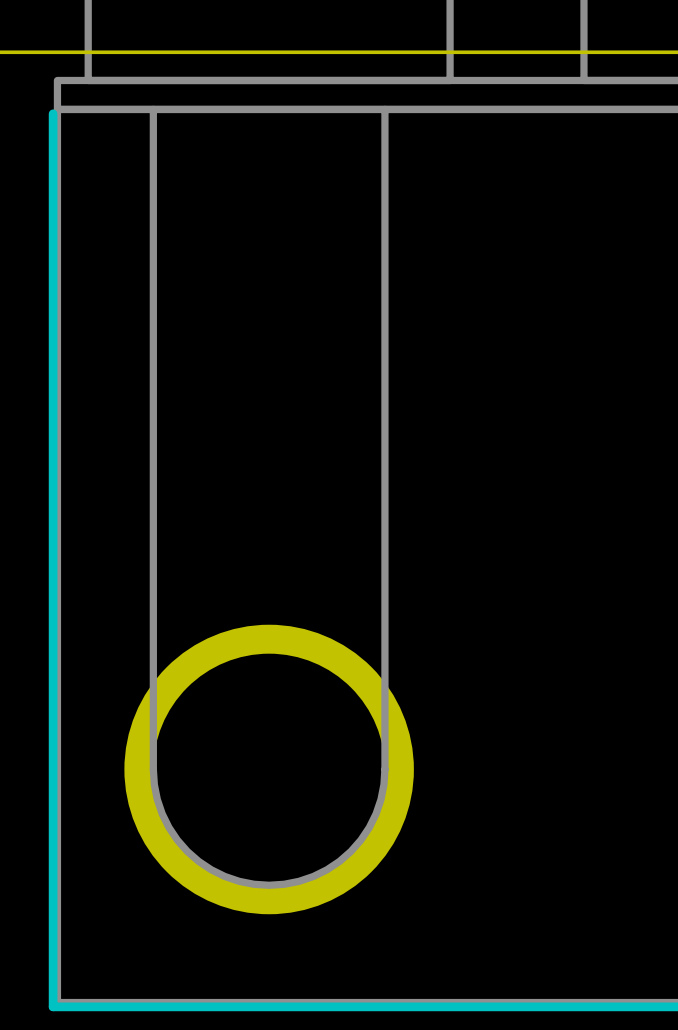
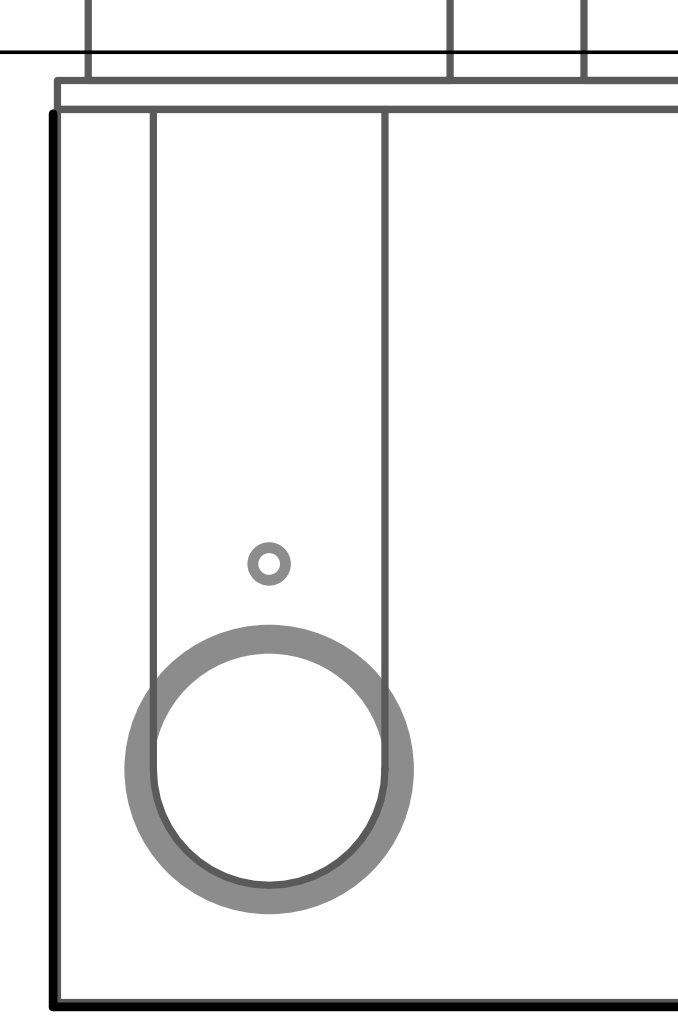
via: none -> (269, 563)

